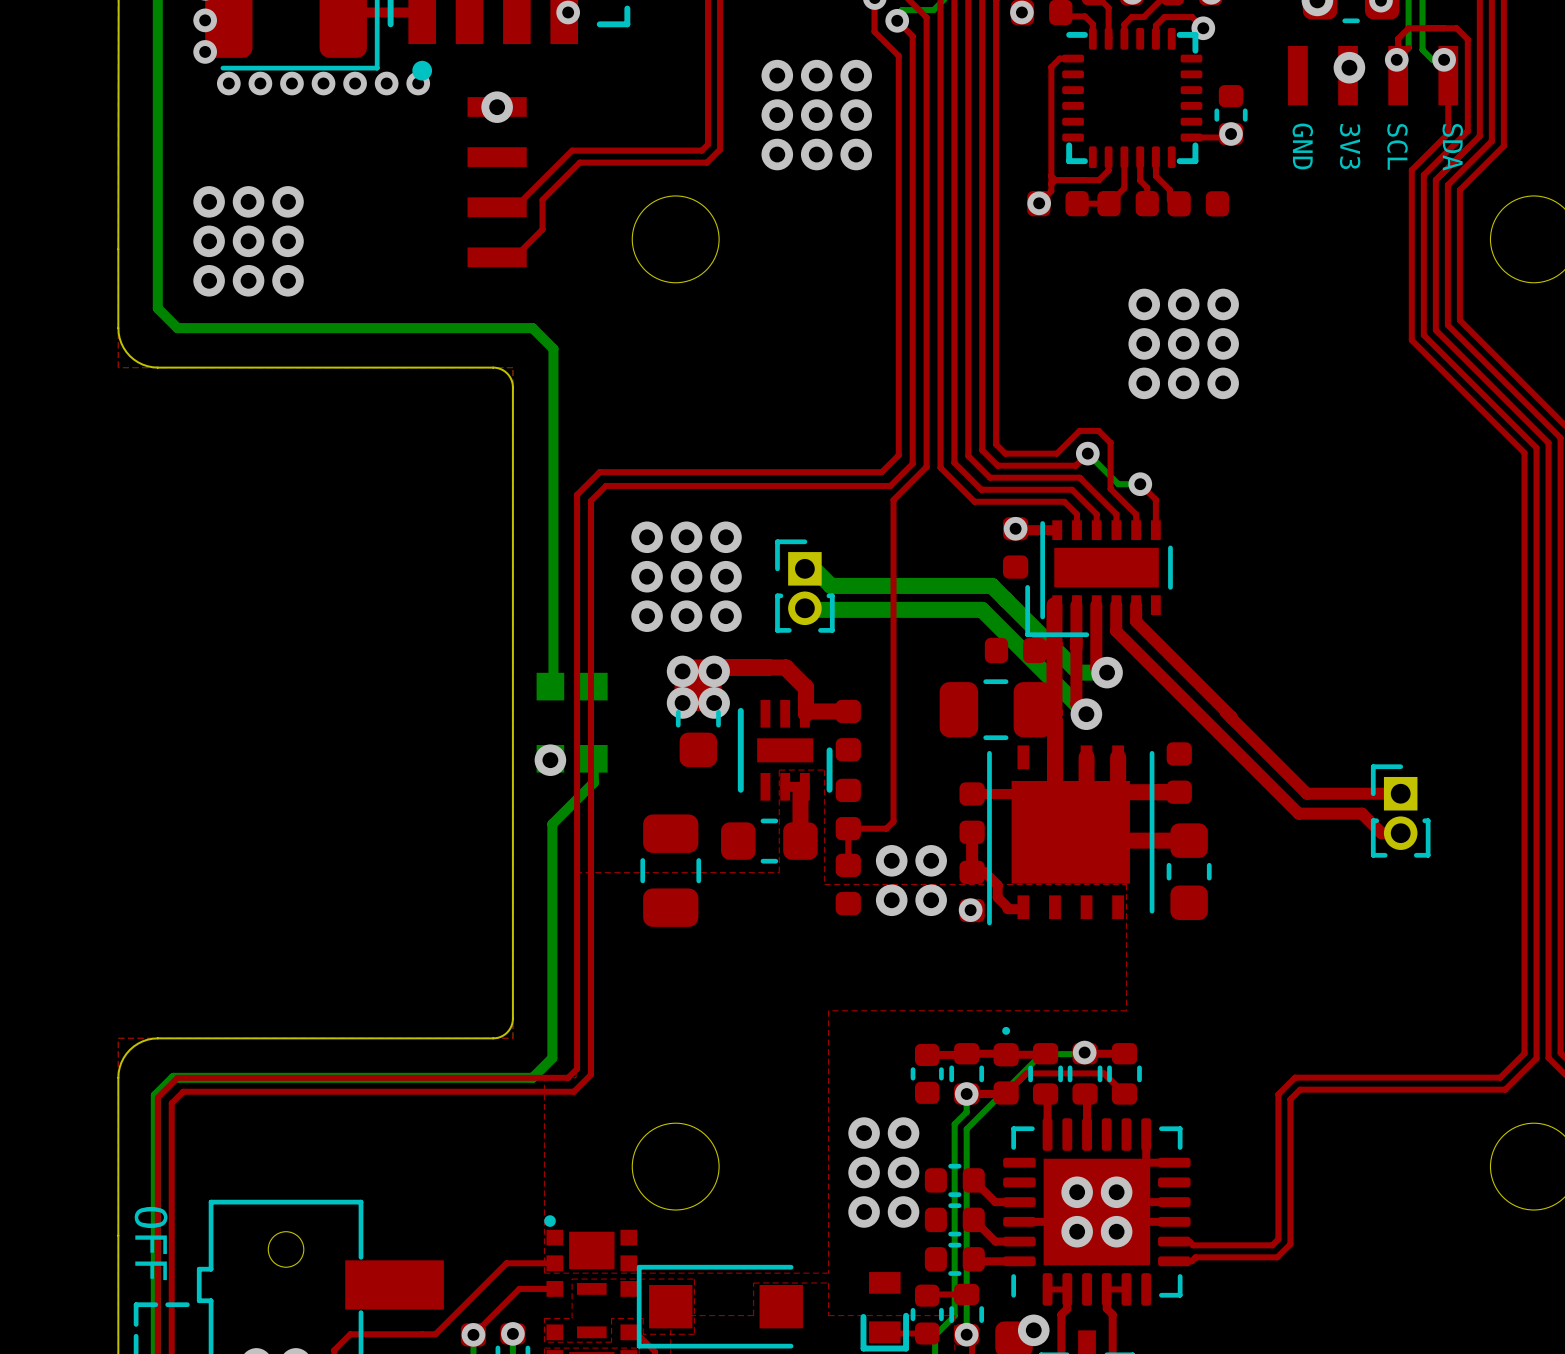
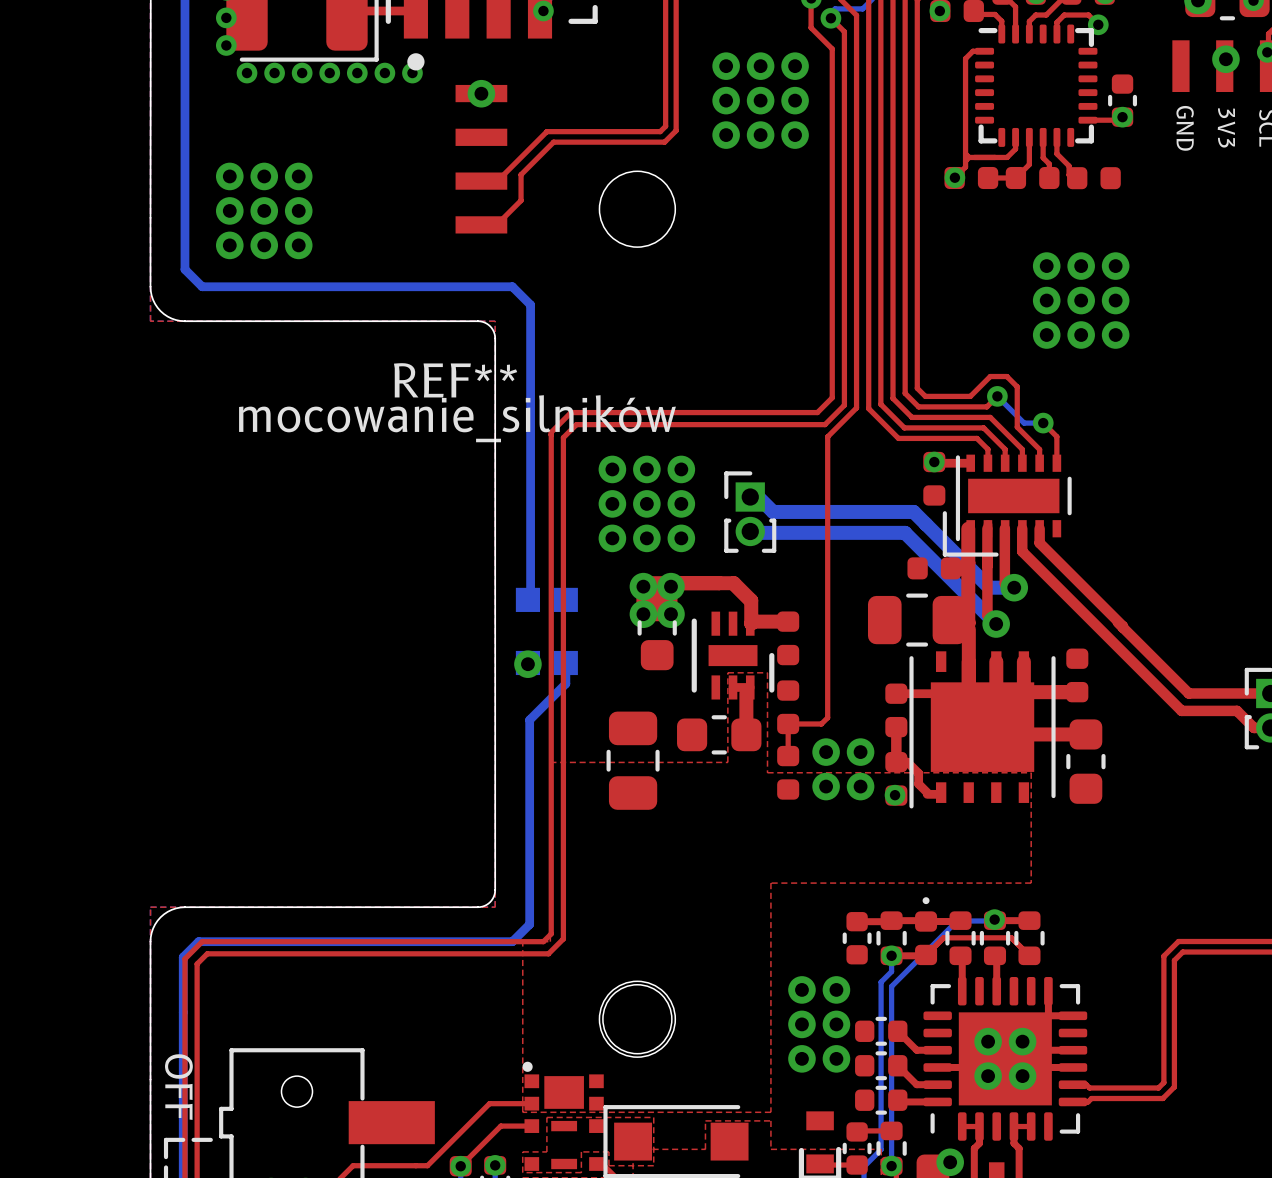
REF**: none -> mocowanie_silników (637, 1019)

